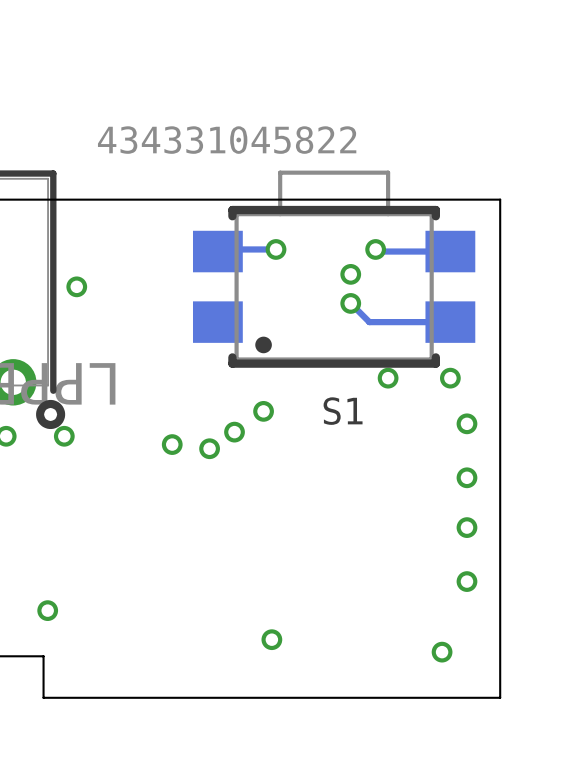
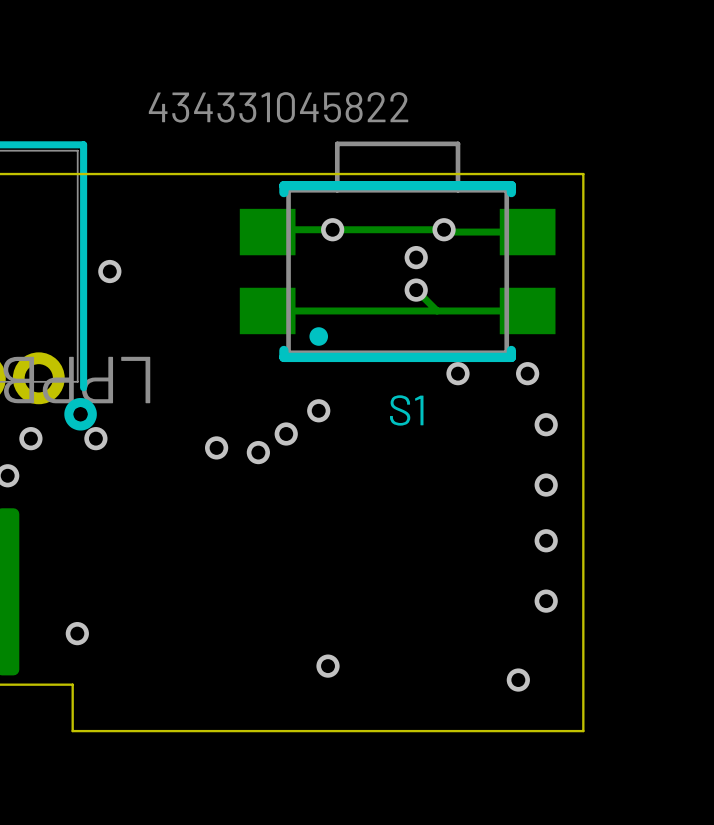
track: none -> (444, 229) (332, 229)
track: none -> (437, 310) (267, 310)

